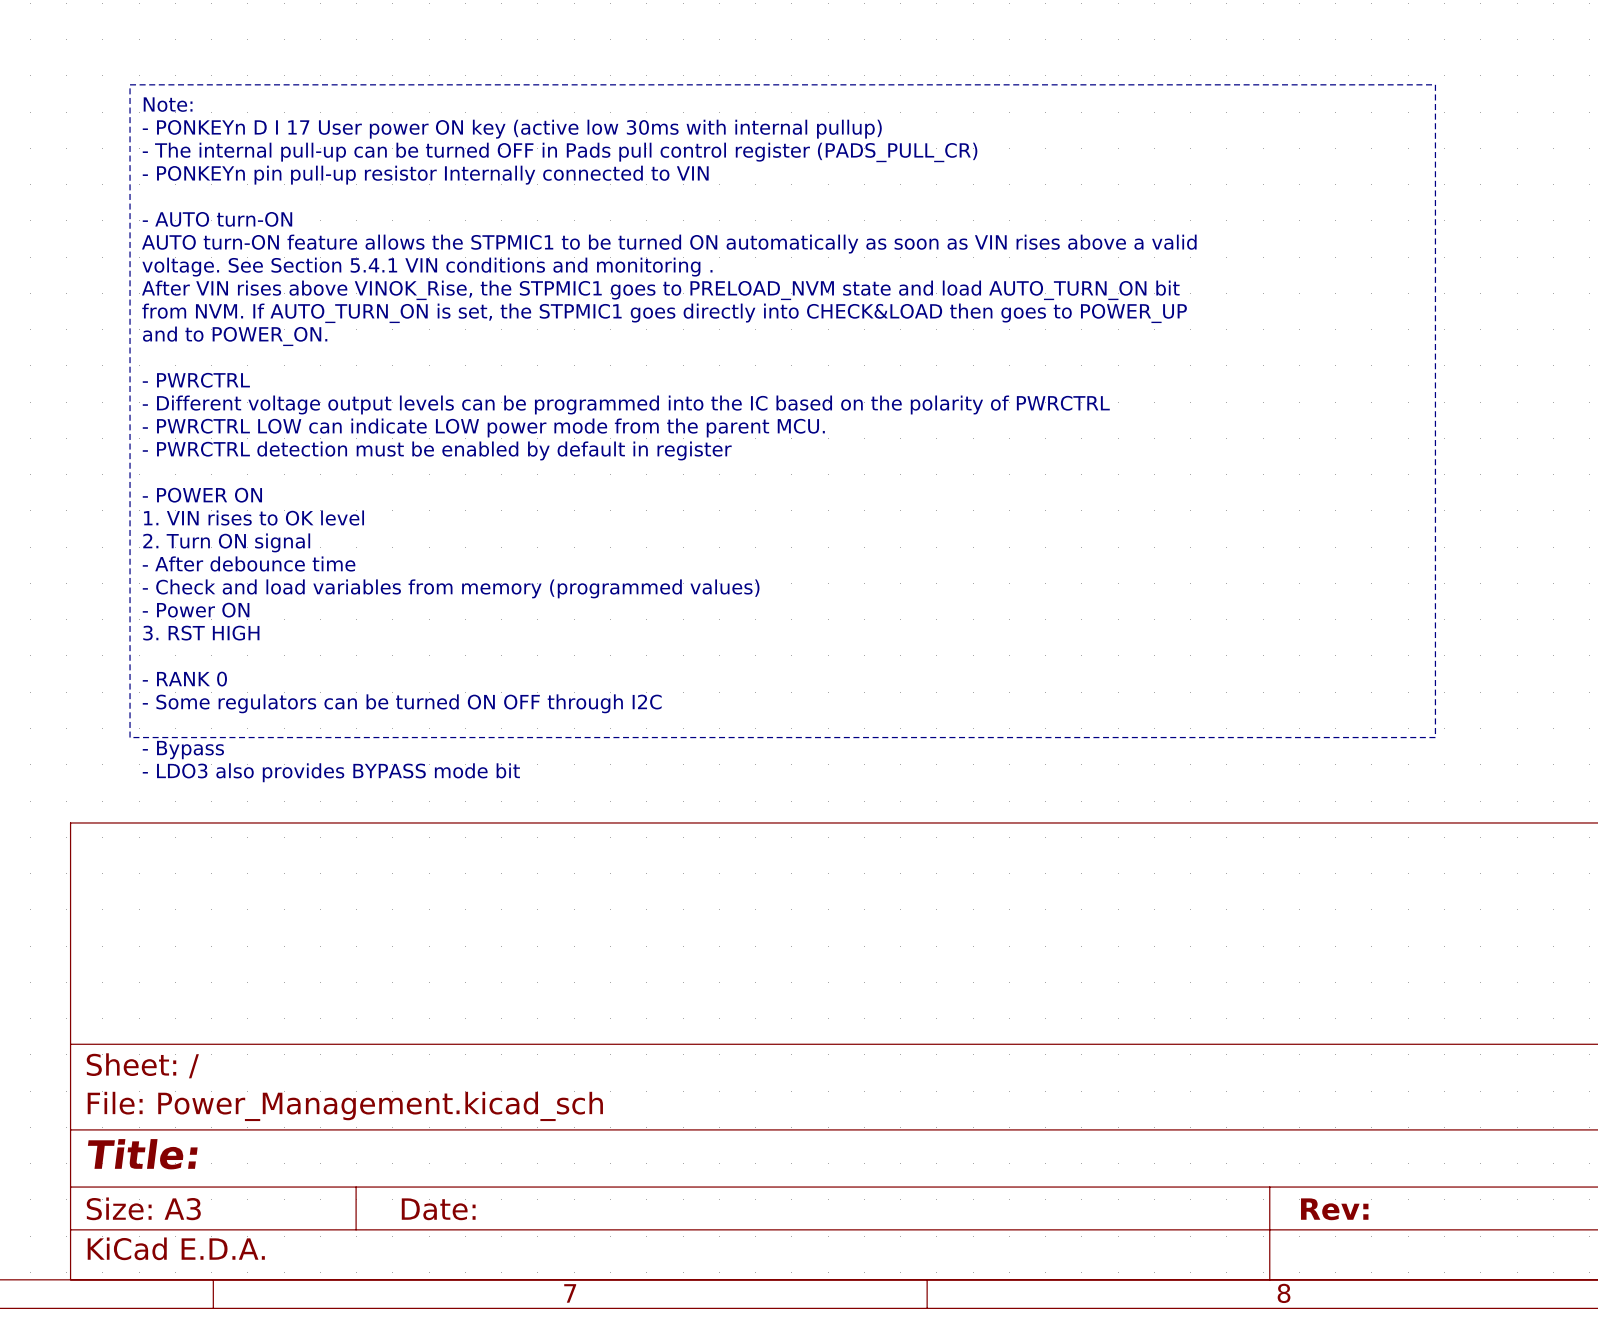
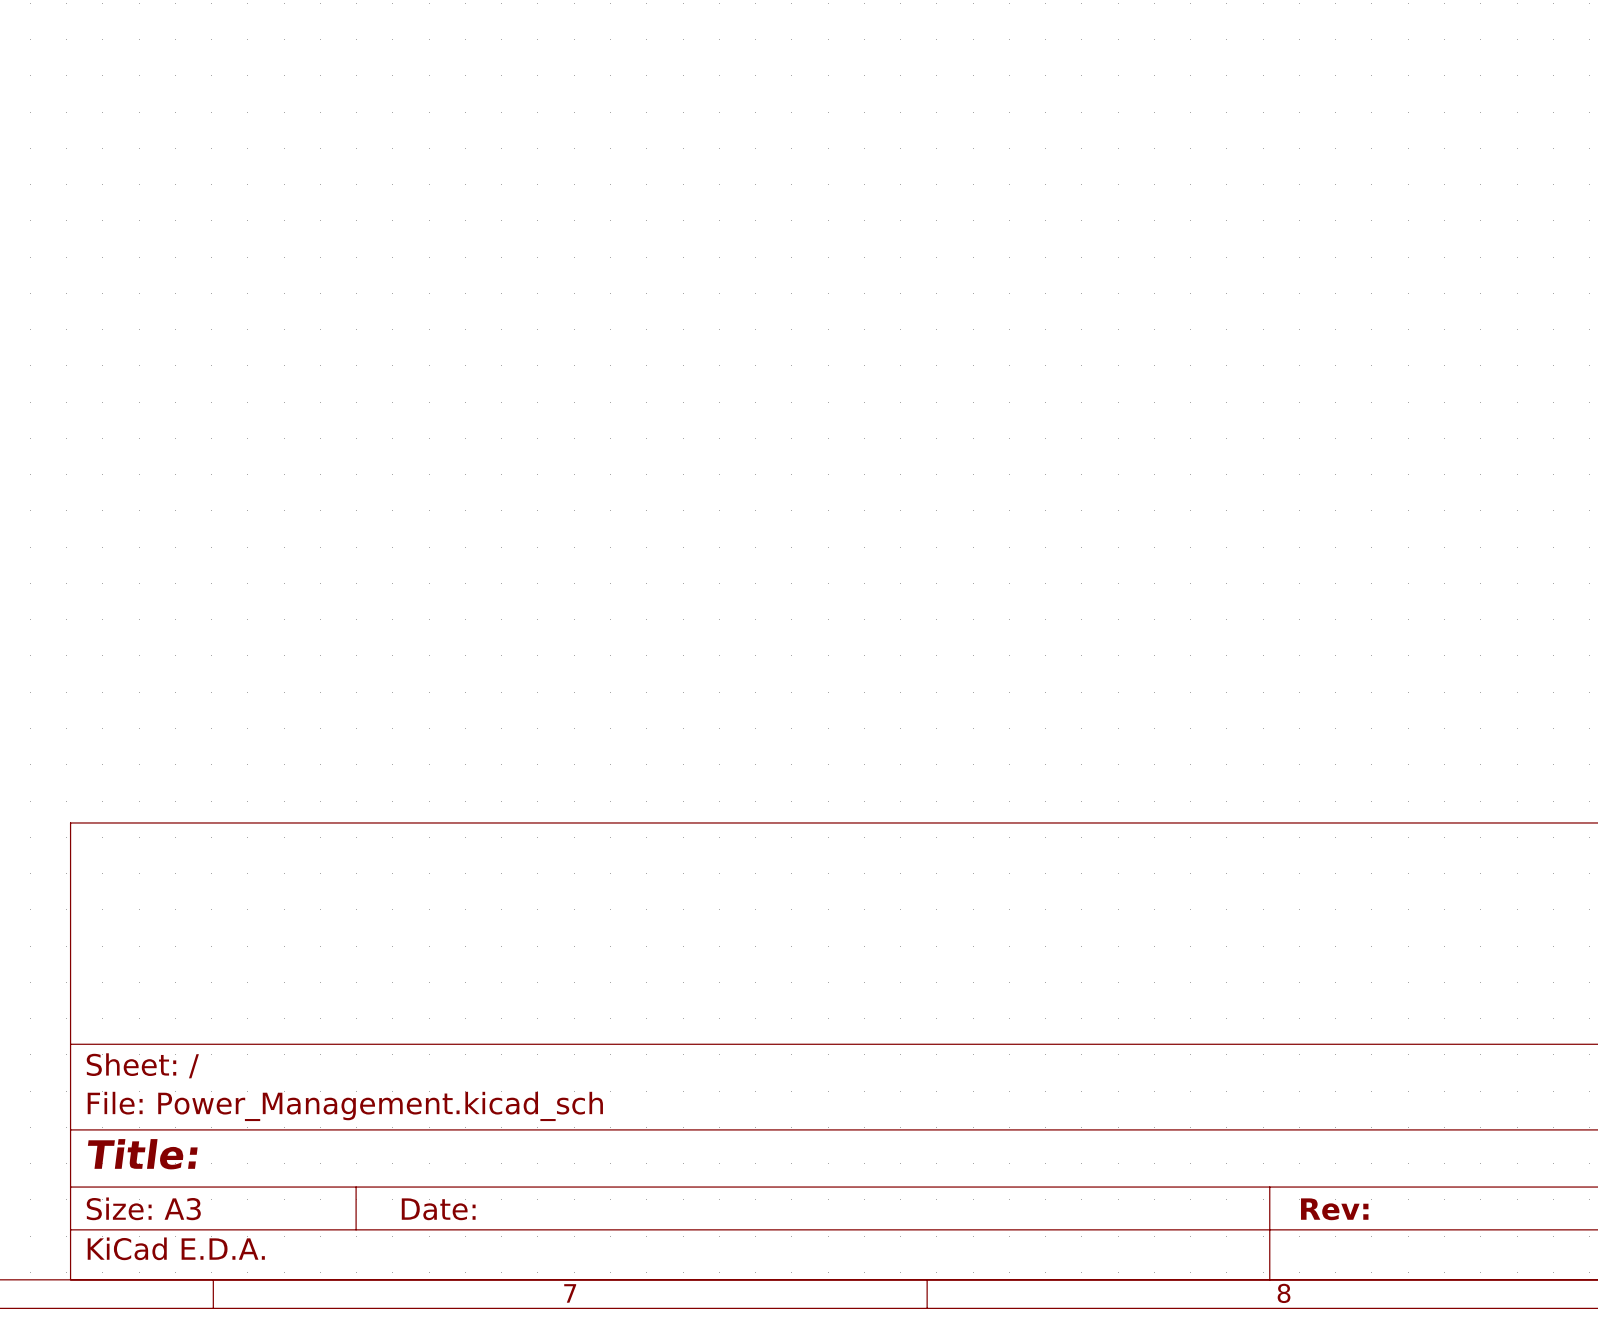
line: (130, 84) (1435, 84) (1435, 737) (130, 737) (130, 84) -> none
text: Note: (168, 104) -> none
text: - PONKEYn D I 17 User power ON key (active low 30ms with internal pullup) (512, 129) -> none
text: - The internal pull-up can be turned OFF in Pads pull control register (PADS_PULL_CR) (560, 152) -> none
text: - PONKEYn pin pull-up resistor Internally connected to VIN (425, 175) -> none
text: - AUTO turn-ON (217, 219) -> none
text: AUTO turn-ON feature allows the STPMIC1 to be turned ON automatically as soon as VIN rises above a valid (669, 244) -> none
text: voltage. See Section 5.4.1 VIN conditions and monitoring . (427, 267) -> none
text: After VIN rises above VINOK_Rise, the STPMIC1 goes to PRELOAD_NVM state and load AUTO_TURN_ON bit (660, 290) -> none
text: from NVM. If AUTO_TURN_ON is set, the STPMIC1 goes directly into CHECK&LOAD then goes to POWER_UP (664, 313) -> none
text: and to POWER_ON. (235, 336) -> none
text: - PWRCTRL (196, 380) -> none
text: - Different voltage output levels can be programmed into the IC based on the polarity of PWRCTRL (626, 404) -> none
text: - PWRCTRL LOW can indicate LOW power mode from the parent MCU. (483, 427) -> none
text: - PWRCTRL detection must be enabled by default in register (437, 450) -> none
text: - POWER ON (202, 495) -> none
text: 1. VIN rises to OK level (253, 518) -> none
text: 2. Turn ON signal (226, 542) -> none
text: - After debounce time (249, 563) -> none
text: - Check and load variables from memory (programmed values) (451, 588) -> none
text: - Power ON (196, 610) -> none
text: 3. RST HIGH (201, 633) -> none
text: - RANK 0 (184, 679) -> none
text: - Some regulators can be turned ON OFF through I2C (402, 703) -> none
text: - Bypass (183, 750) -> none
text: - LDO3 also provides BYPASS mode bit (331, 772) -> none

